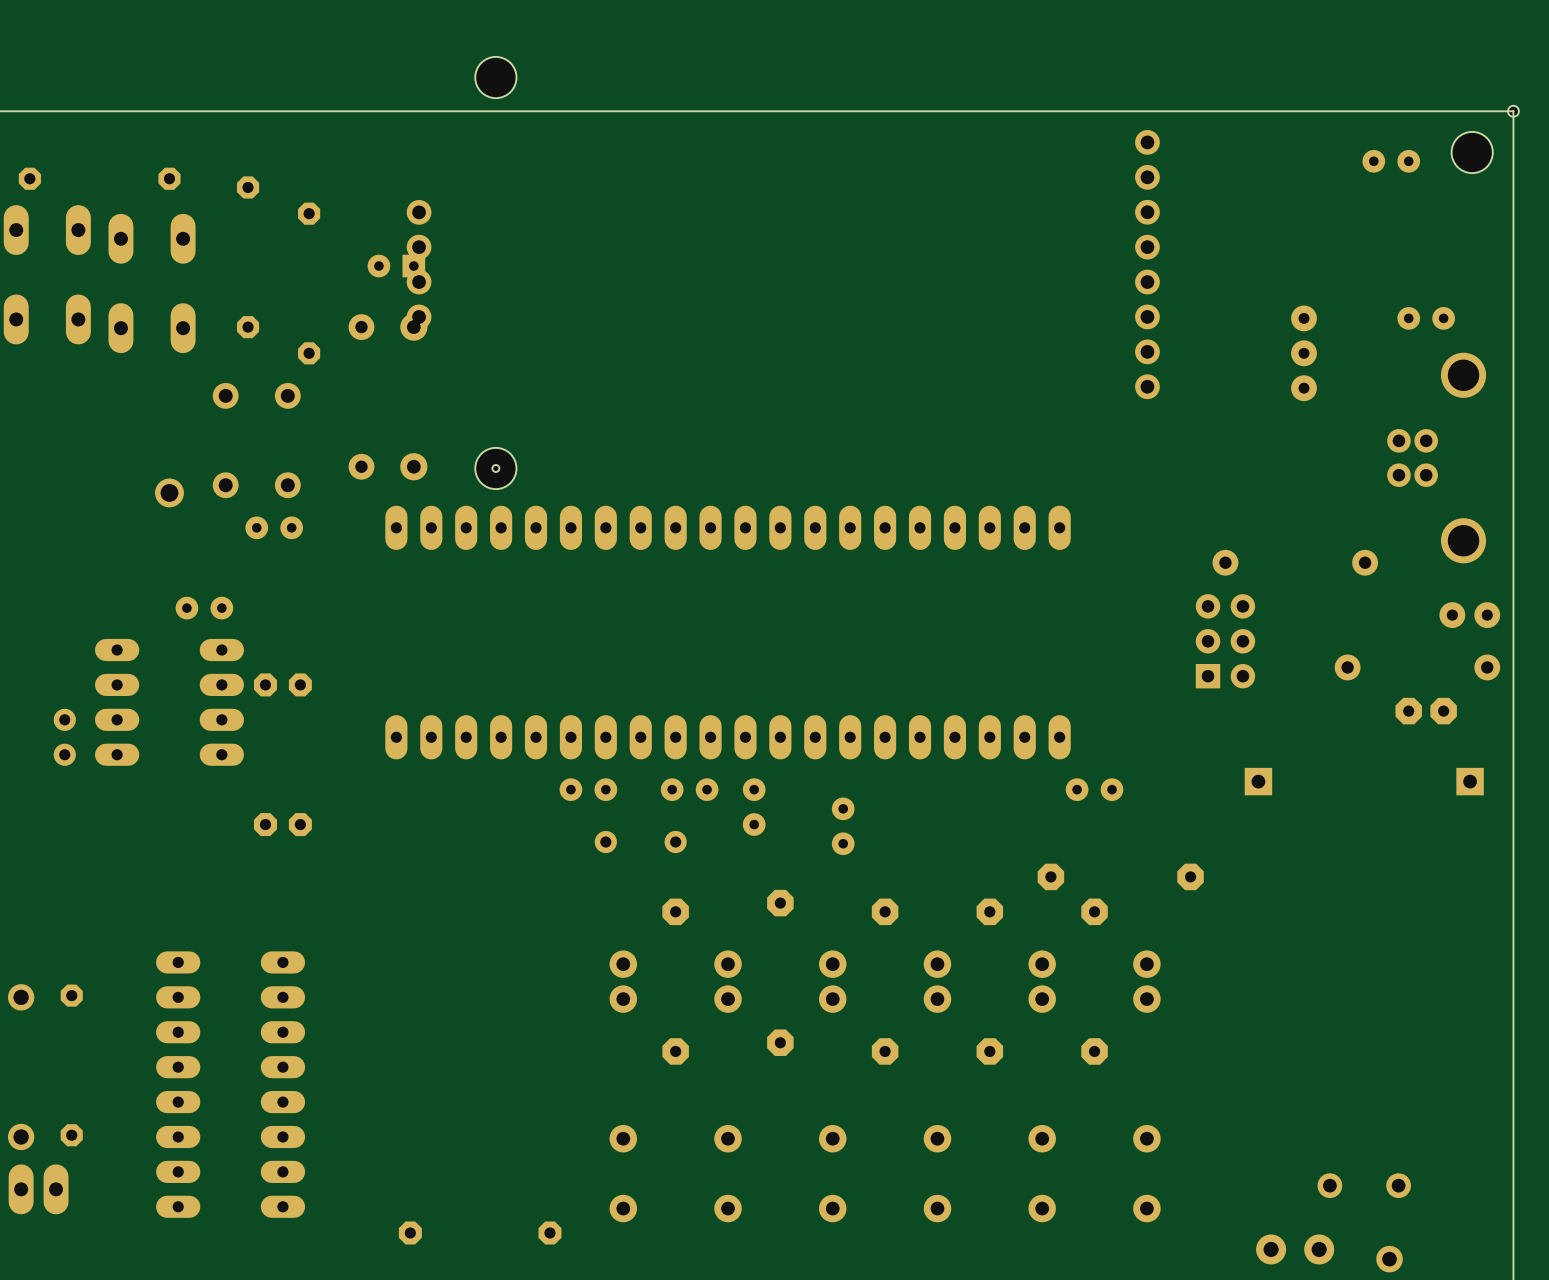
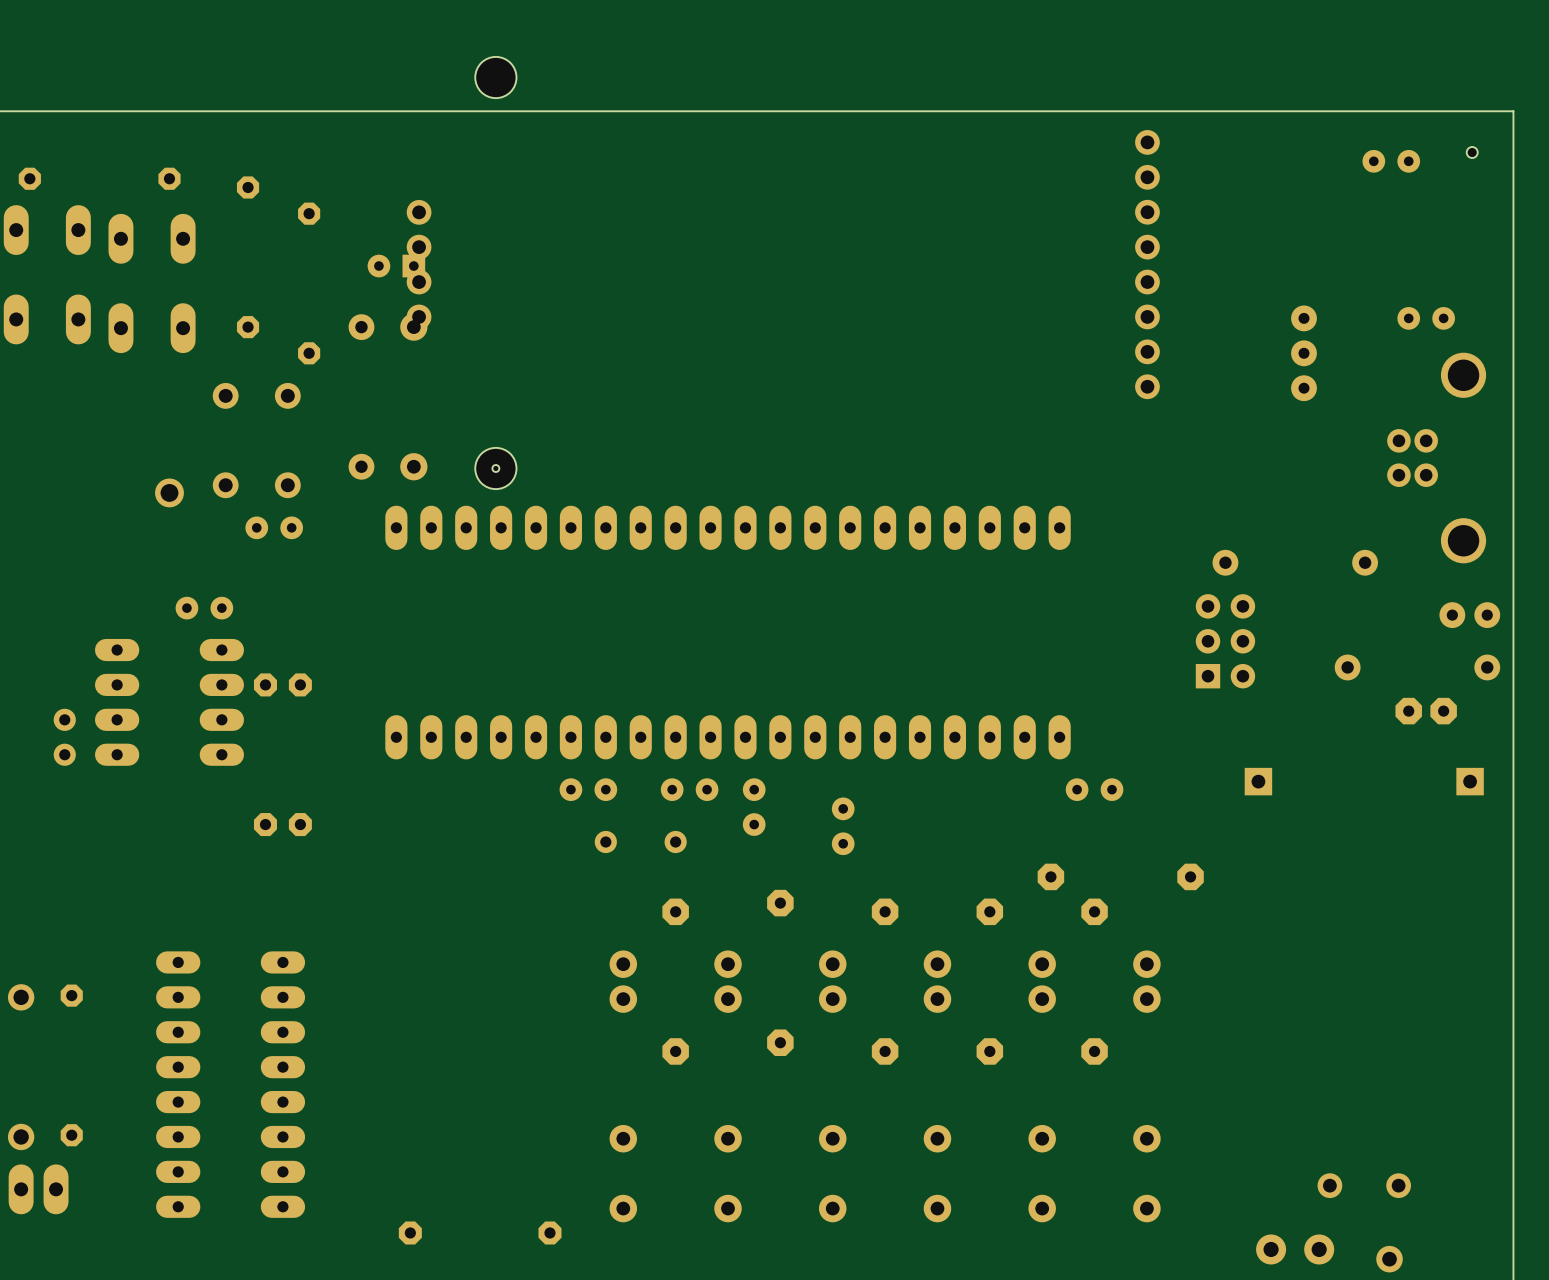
hole position: (1513, 111) -> (1472, 152)
hole: (1472, 152) -> none

